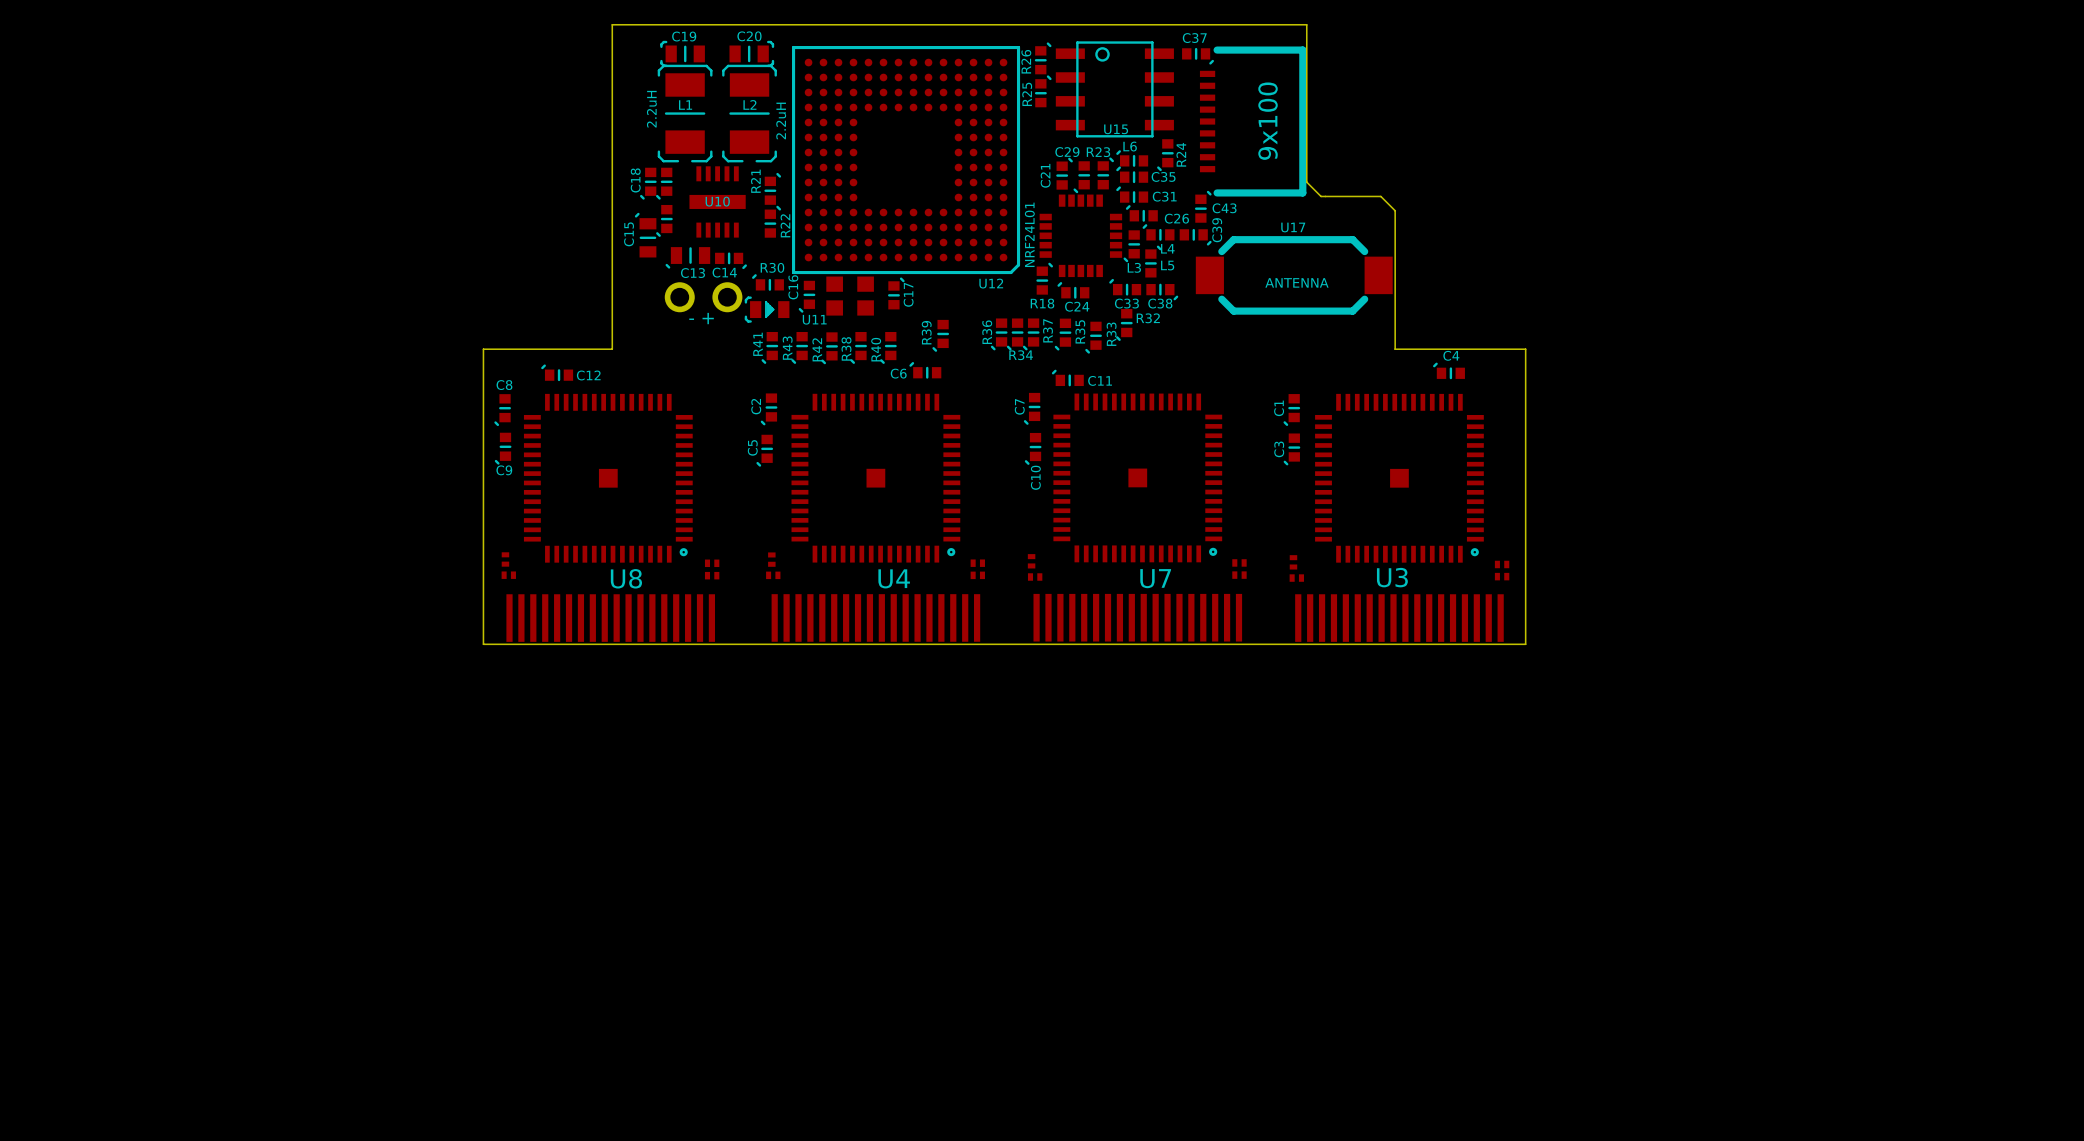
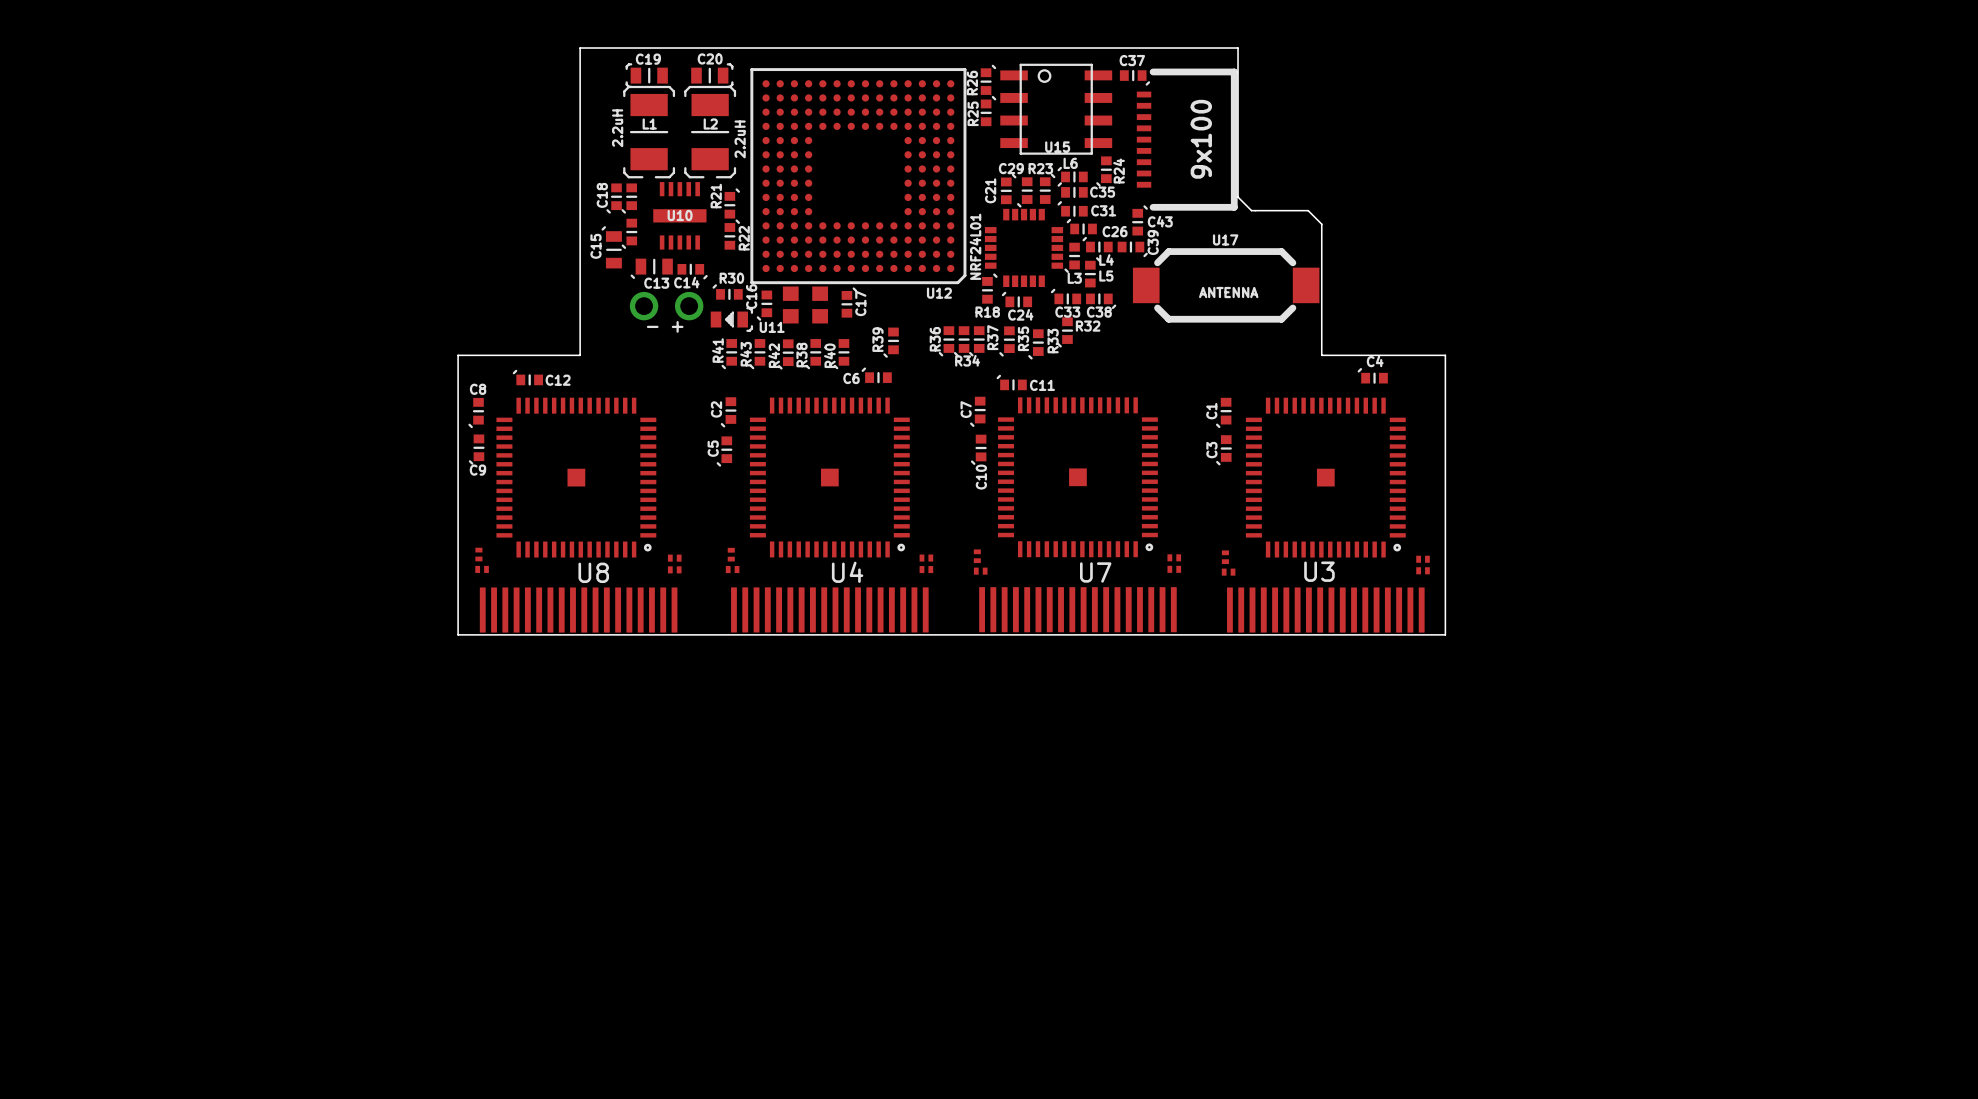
part rotation: 0° (767, 309) -> 180° (731, 319)

